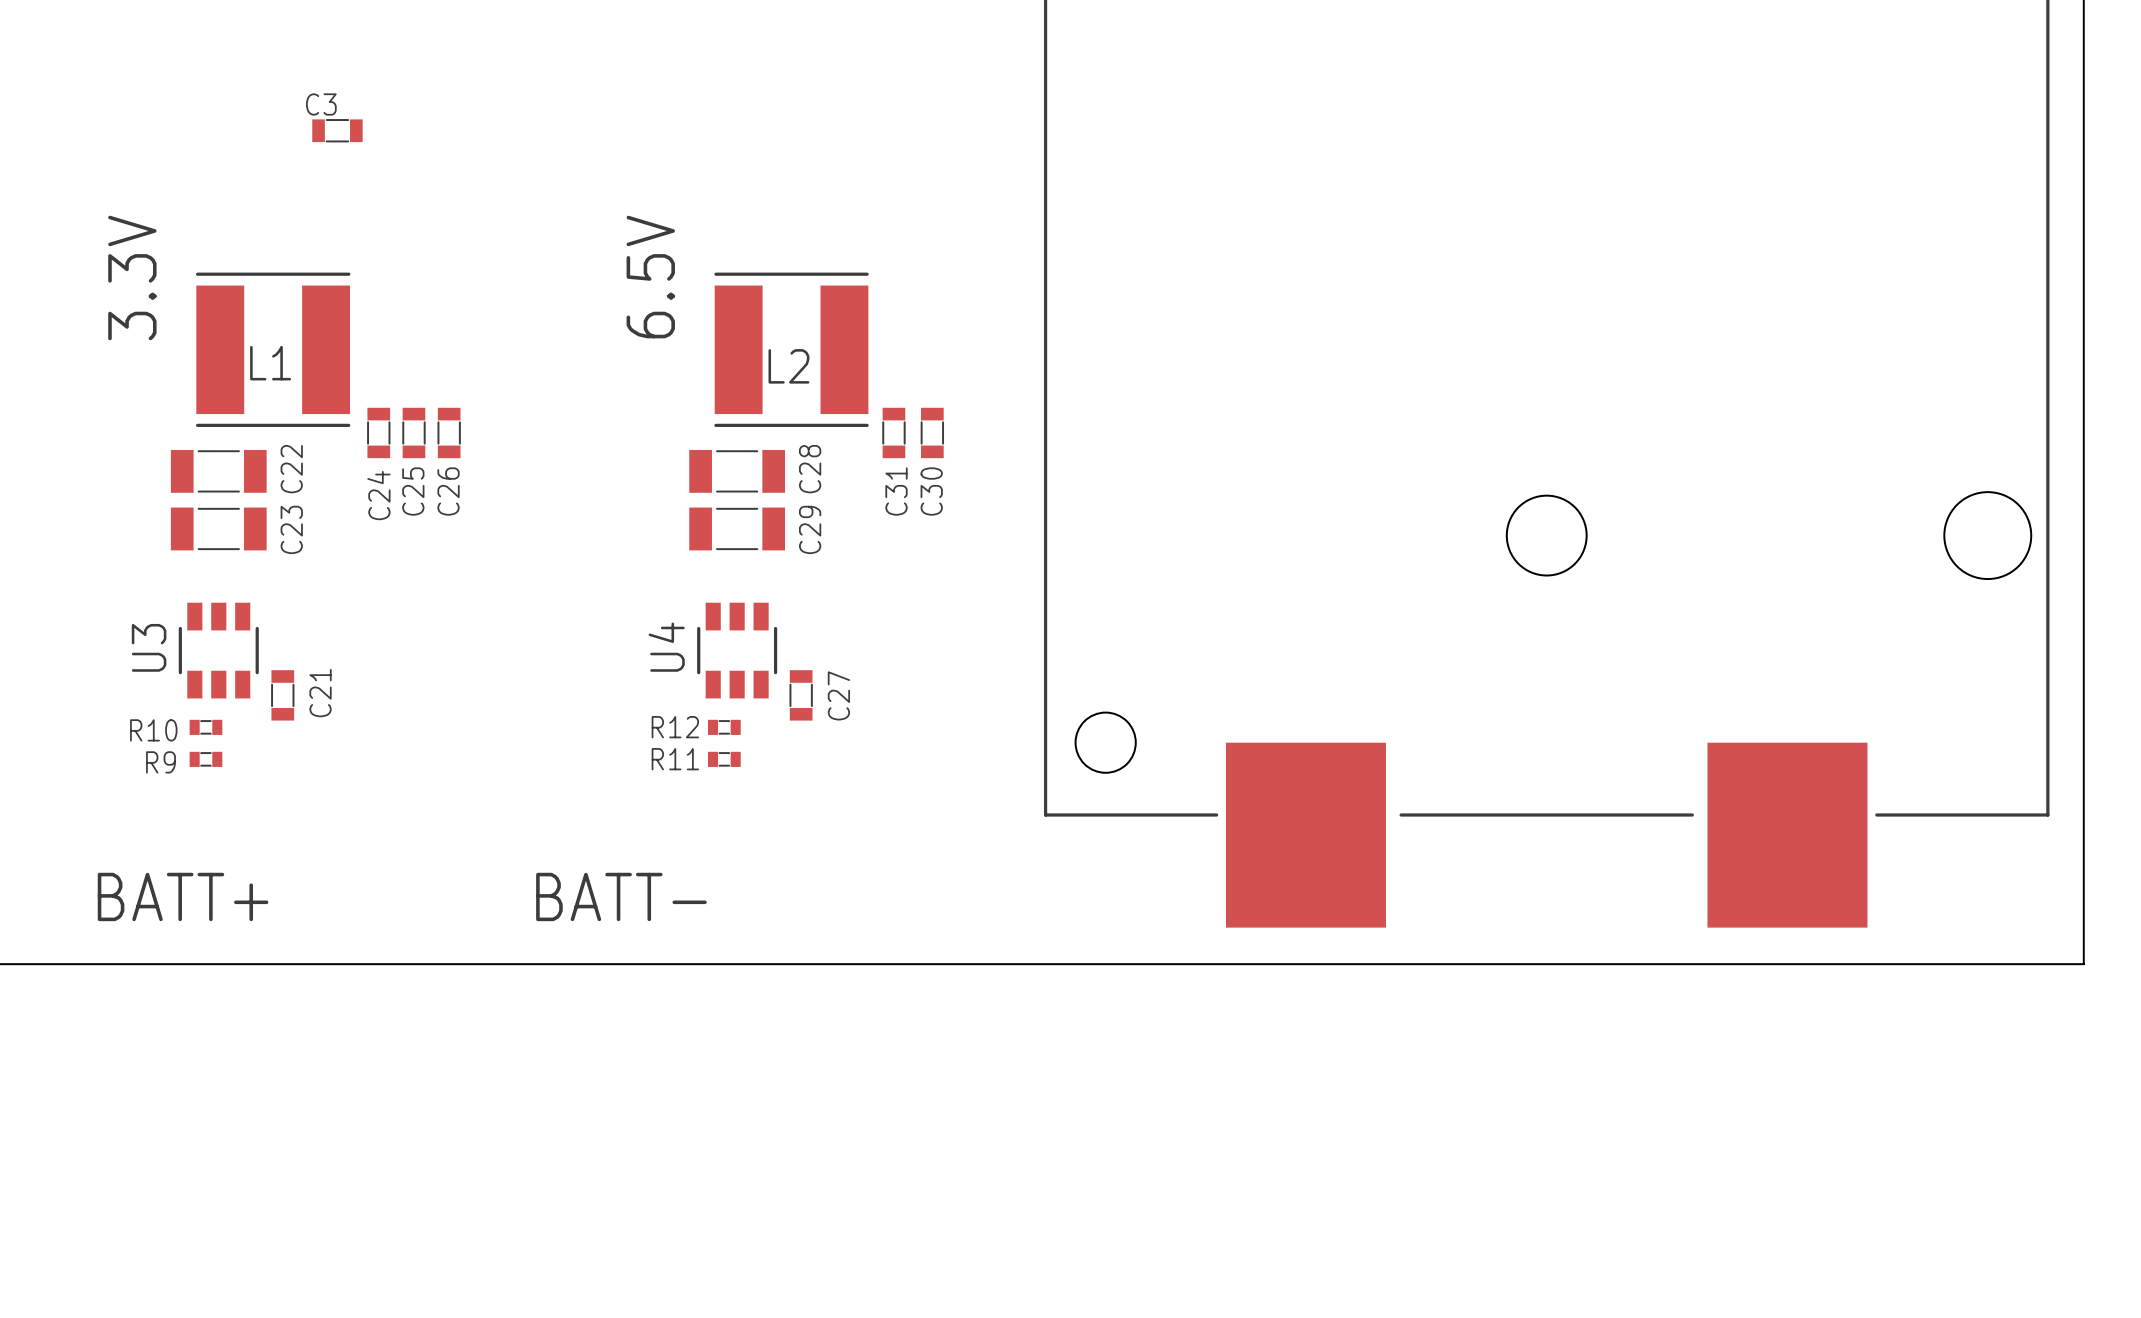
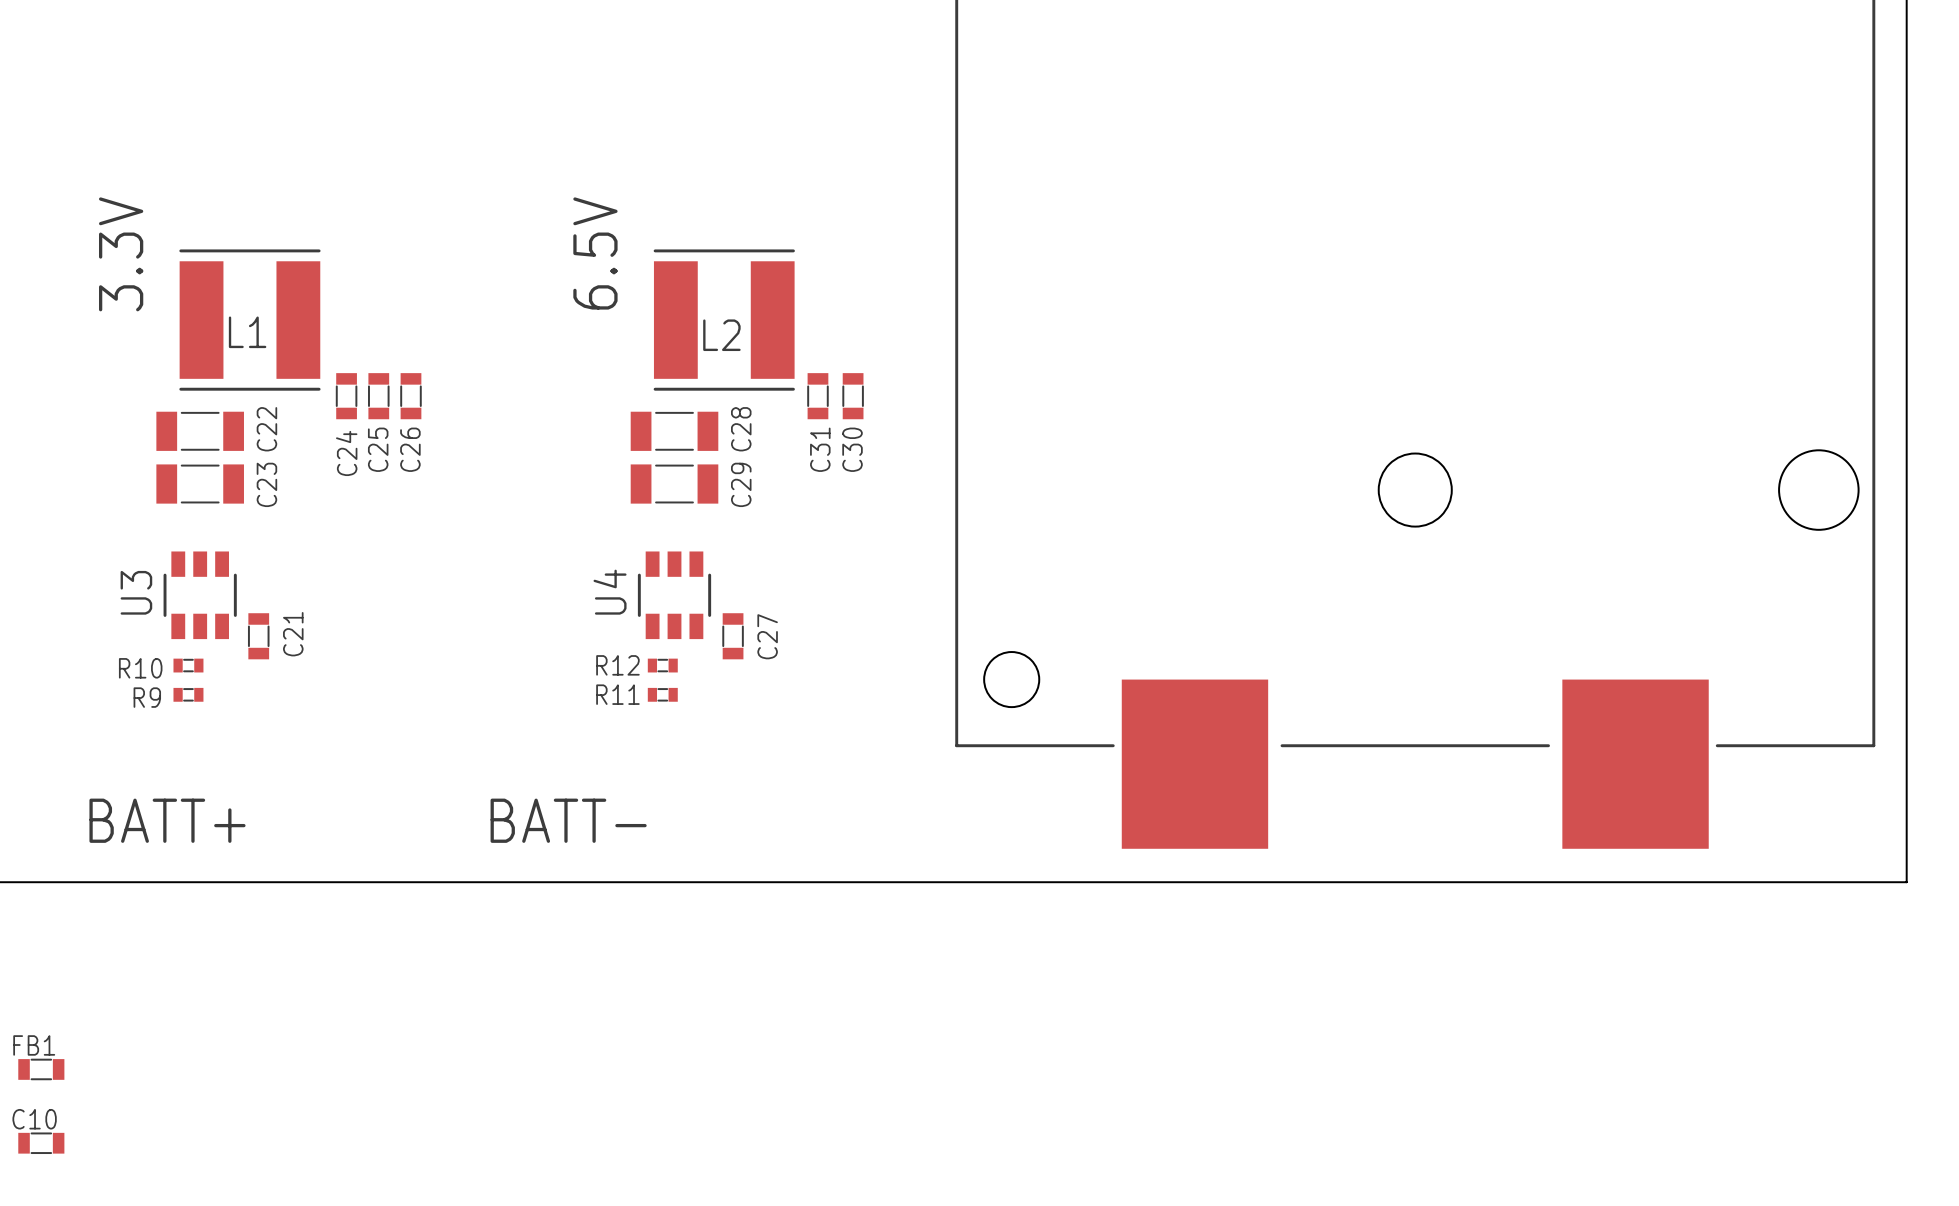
C3: (337, 130) -> none
FB1: none -> (41, 1069)
C10: none -> (41, 1143)

